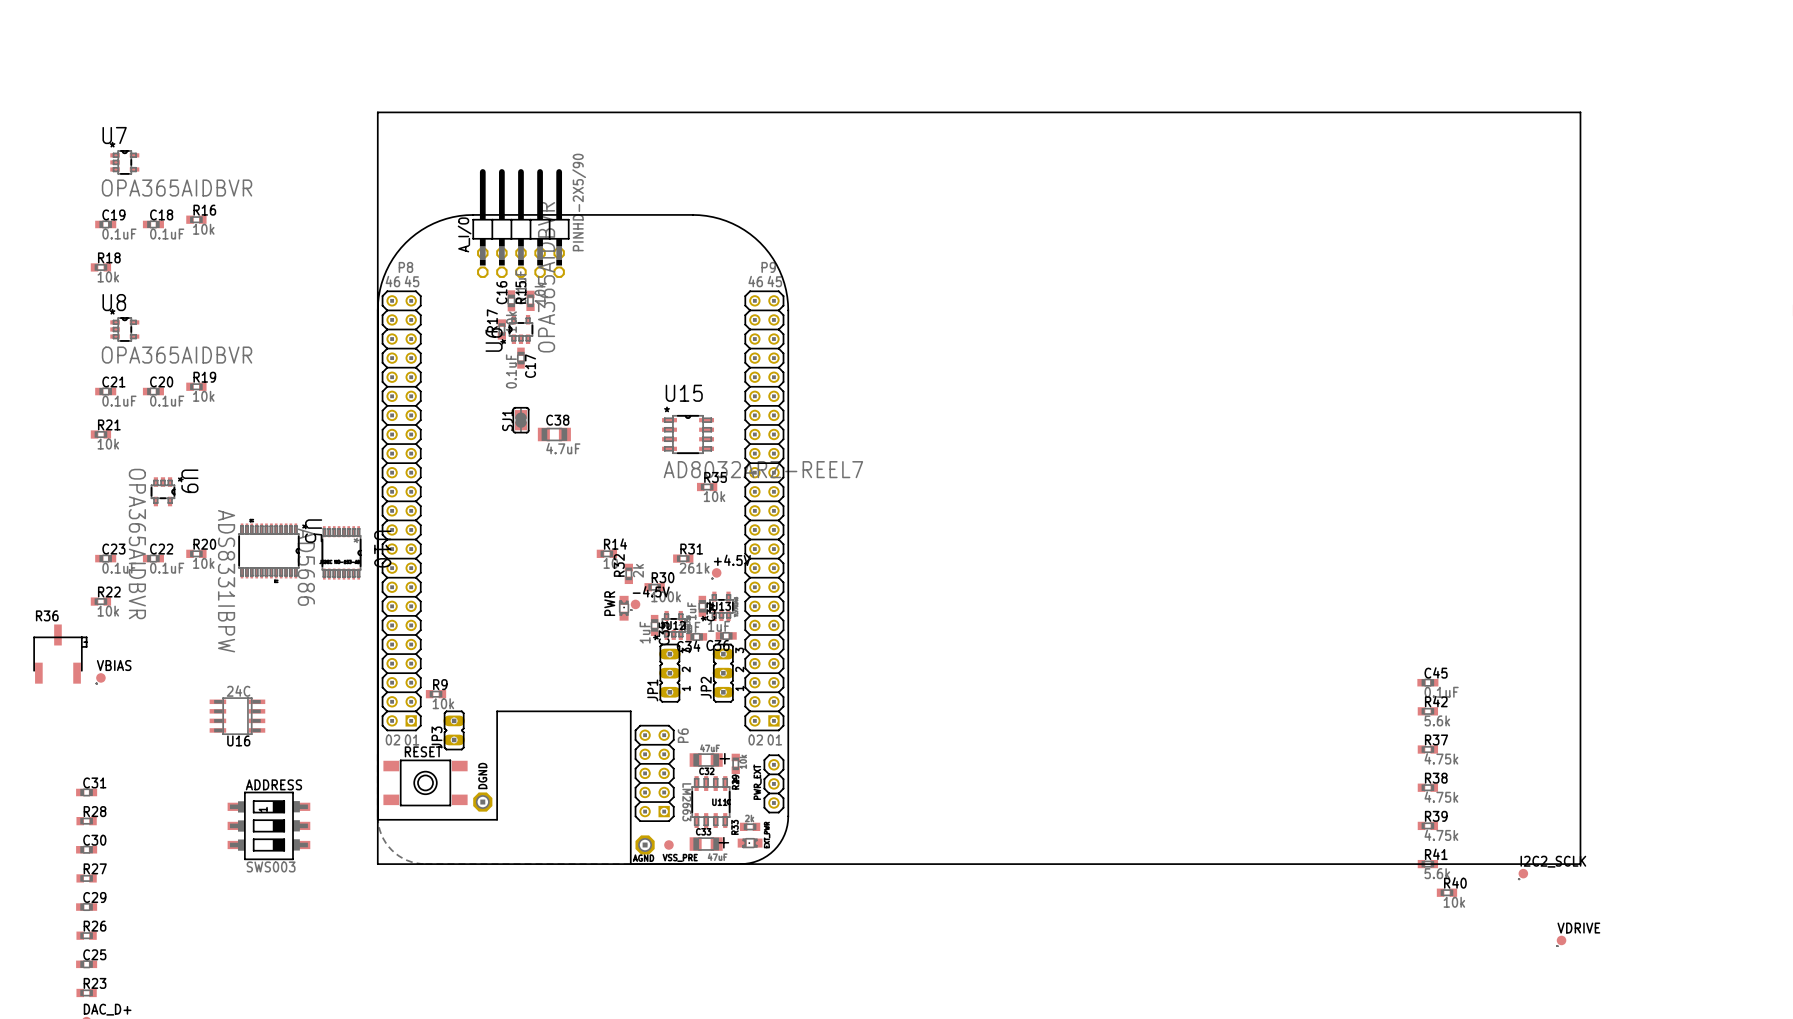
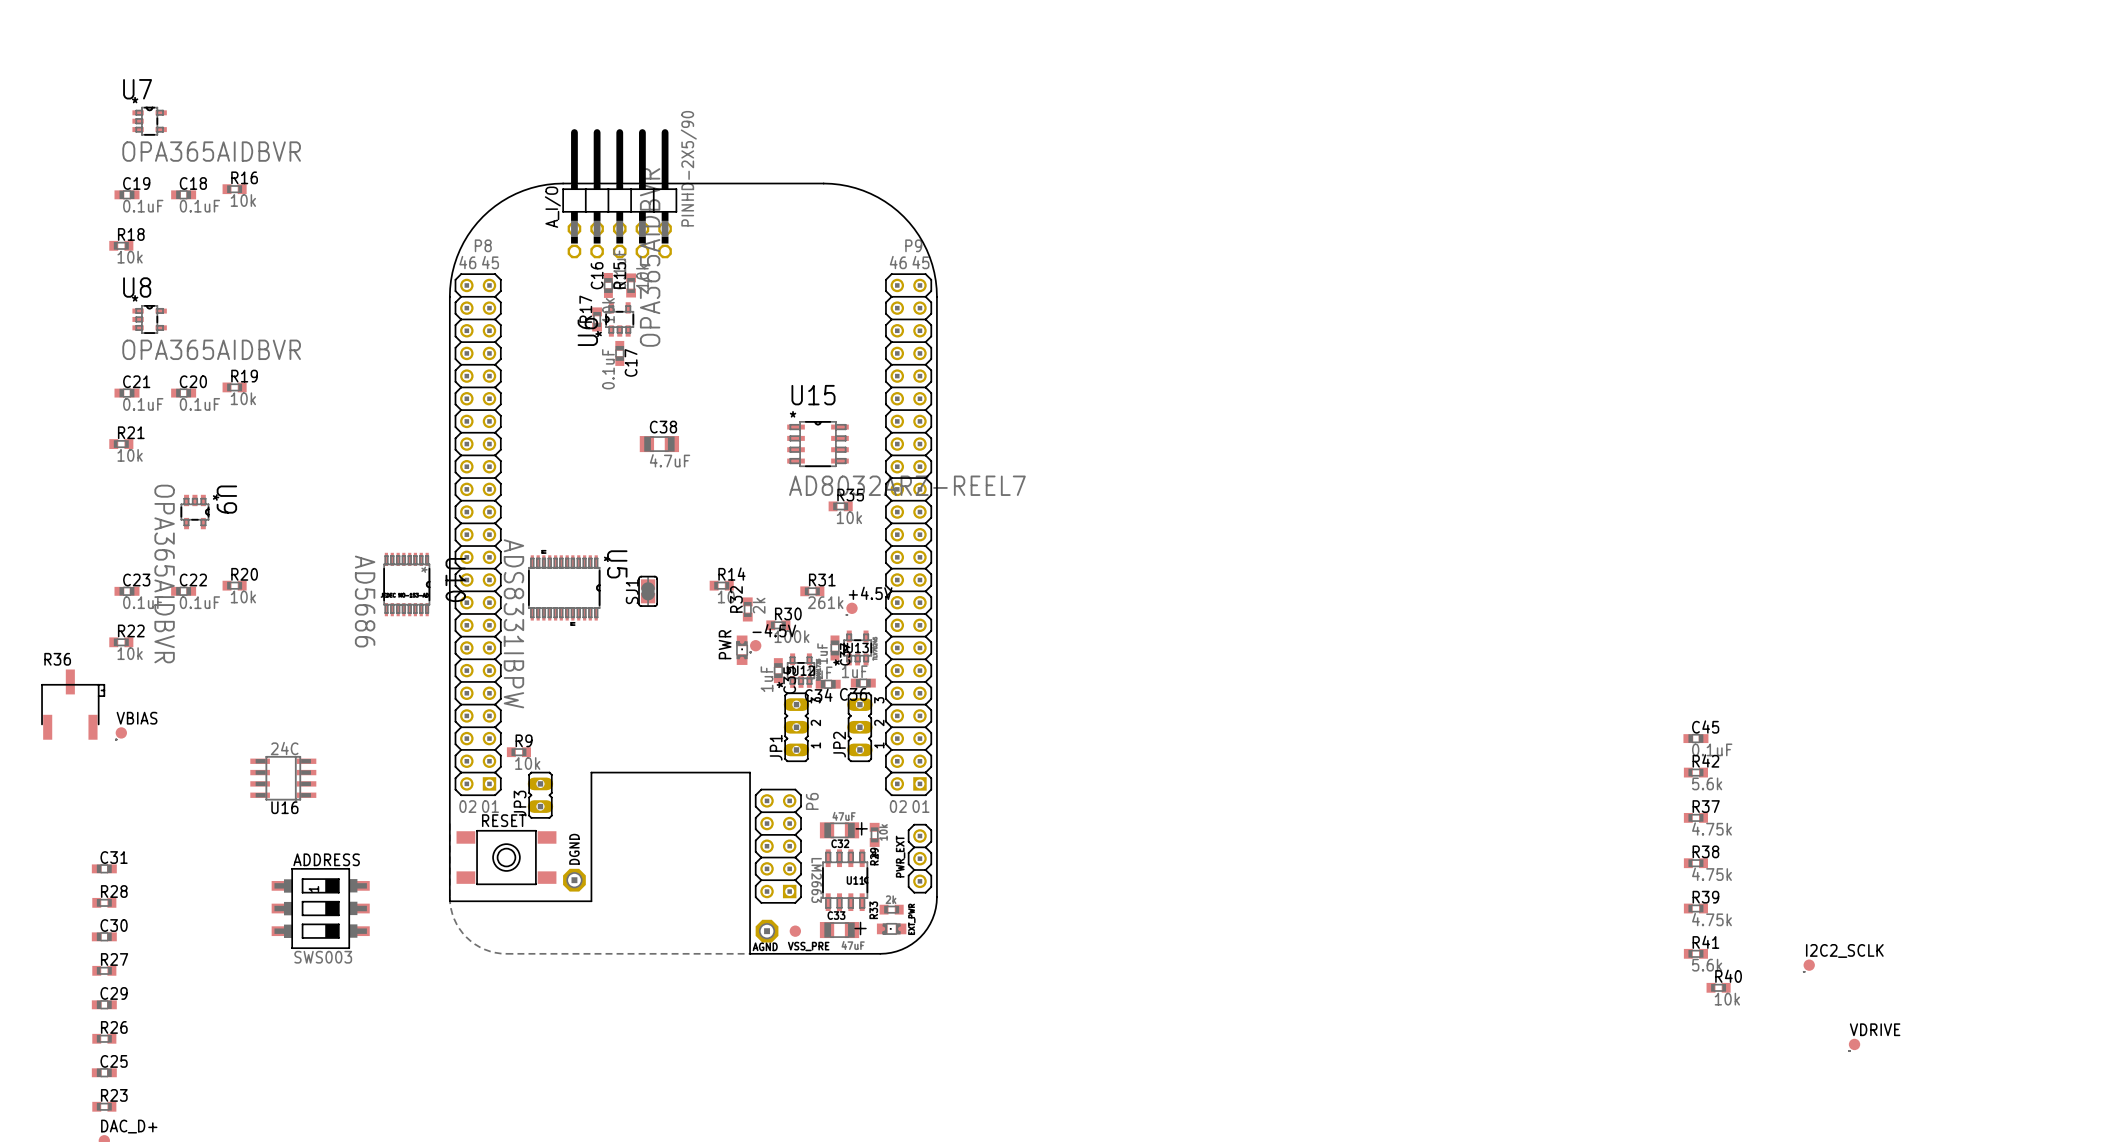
board edge: (377, 112) (1580, 112) (1580, 864) (377, 864) (377, 112) -> none
SJ1 position: (520, 420) -> (648, 591)
U5 position: (268, 550) -> (564, 587)

